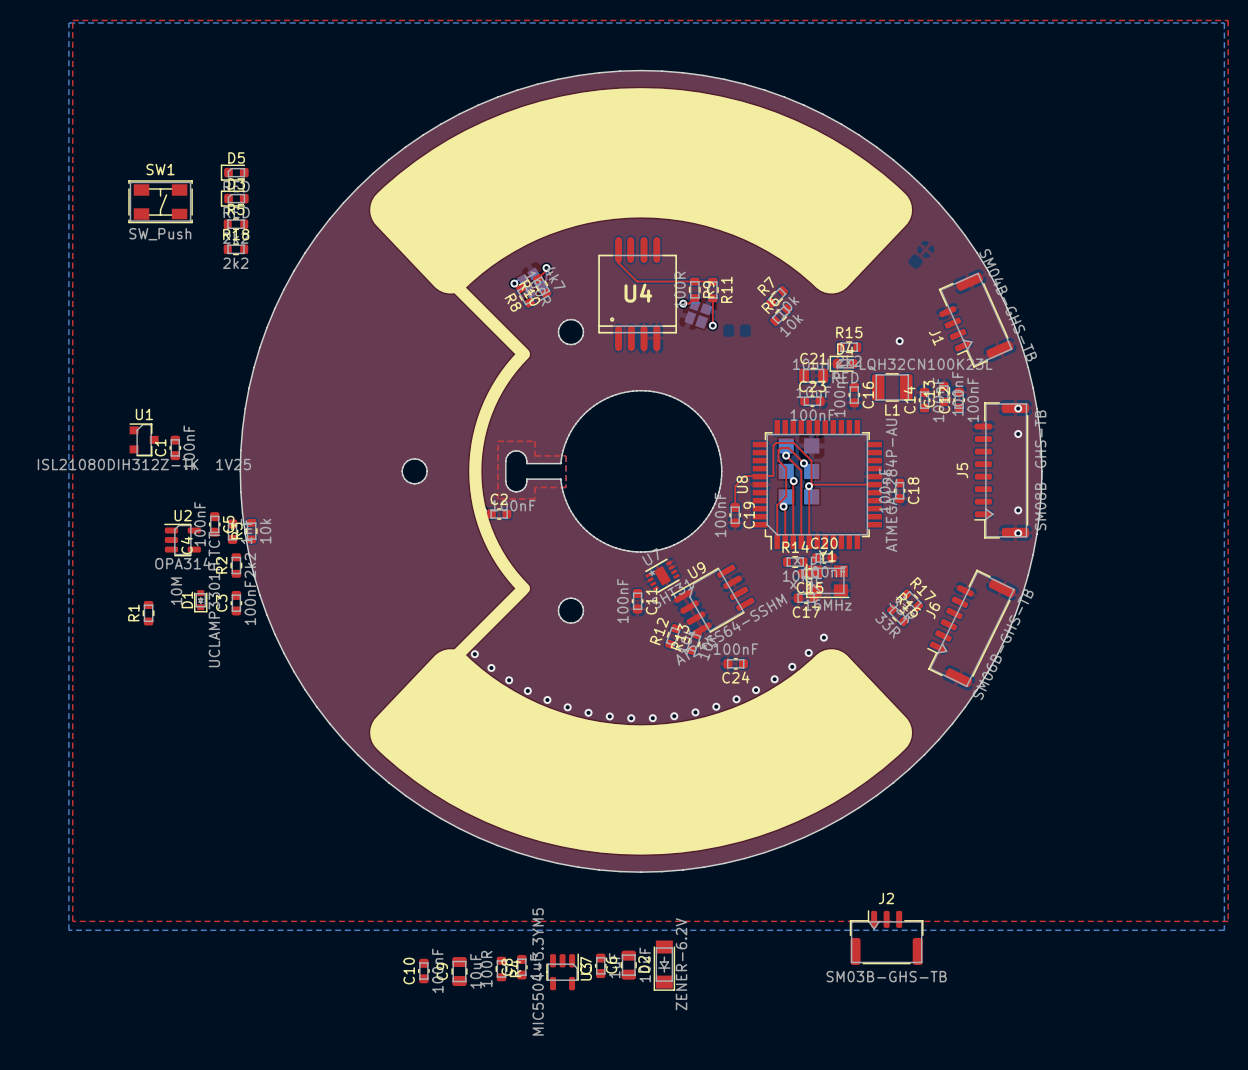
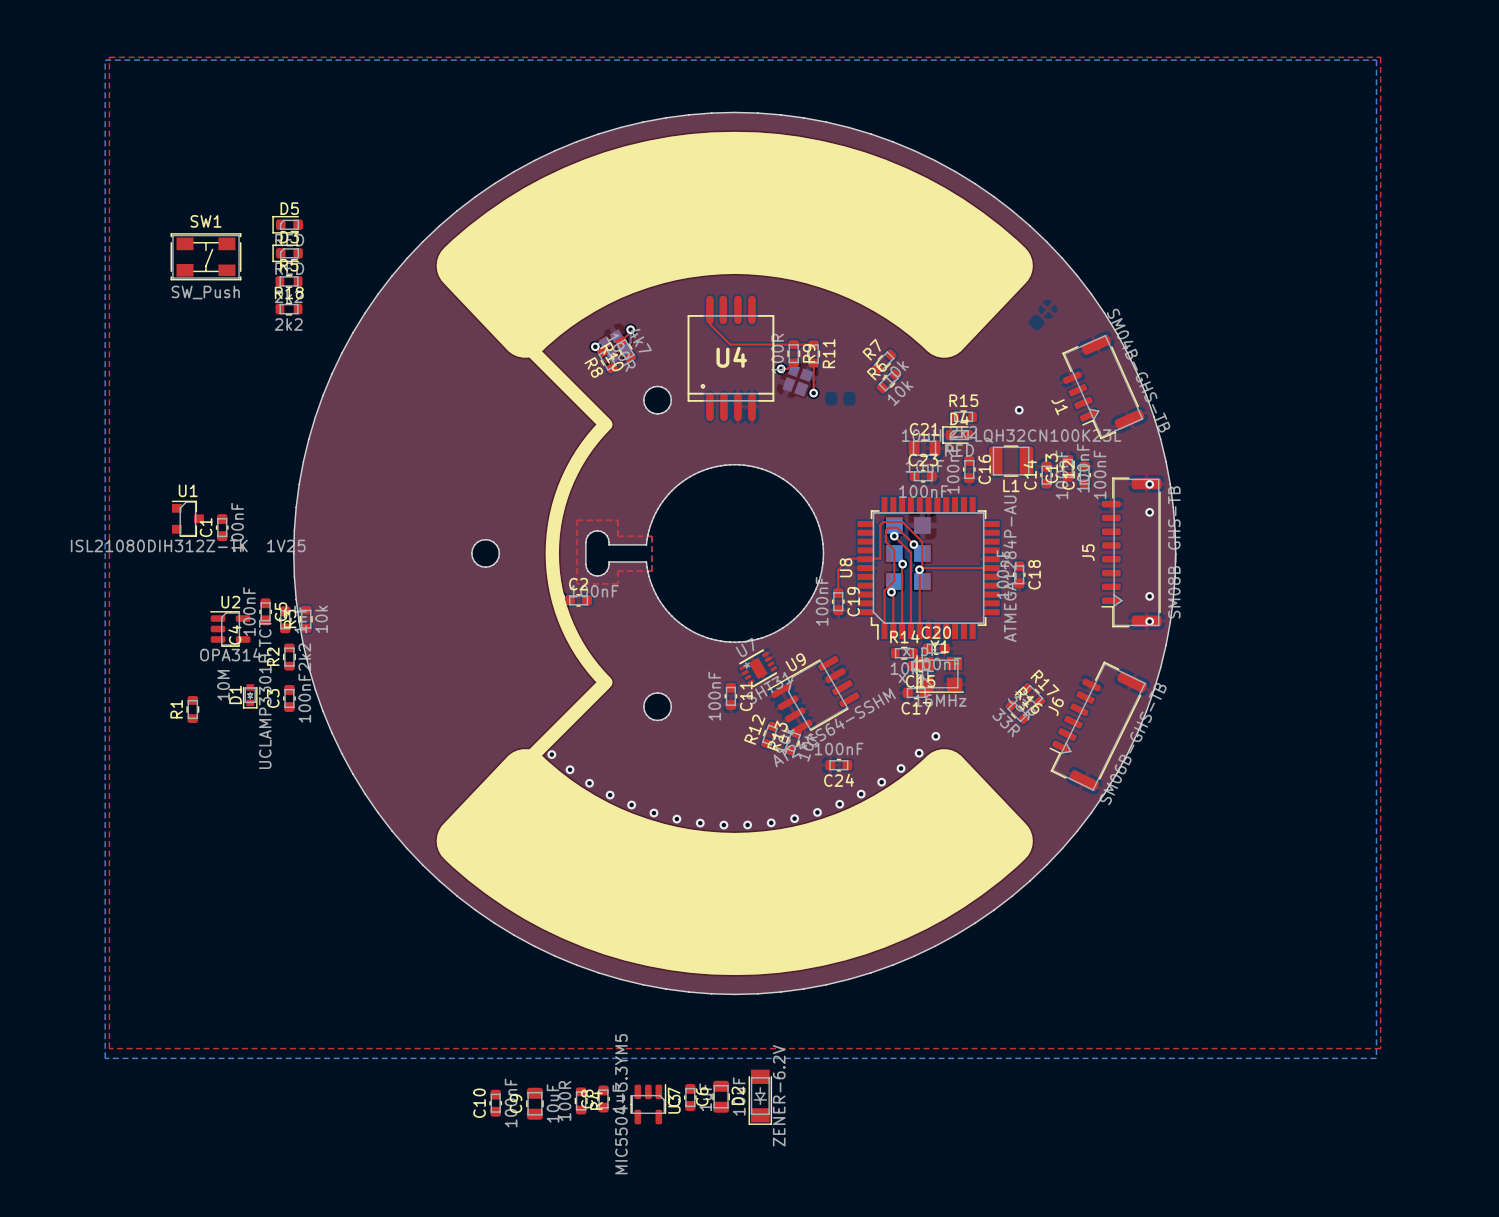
J2: SM03B-GHS-TB (886, 937) -> none

